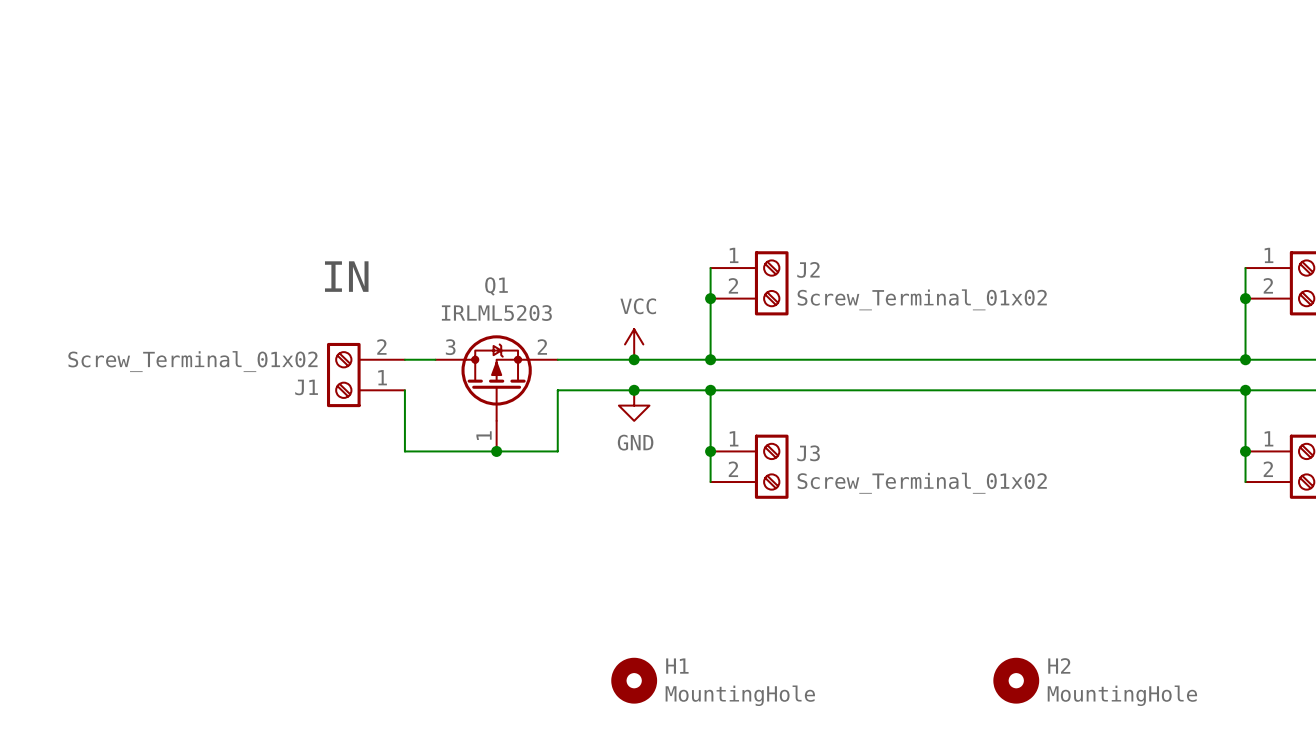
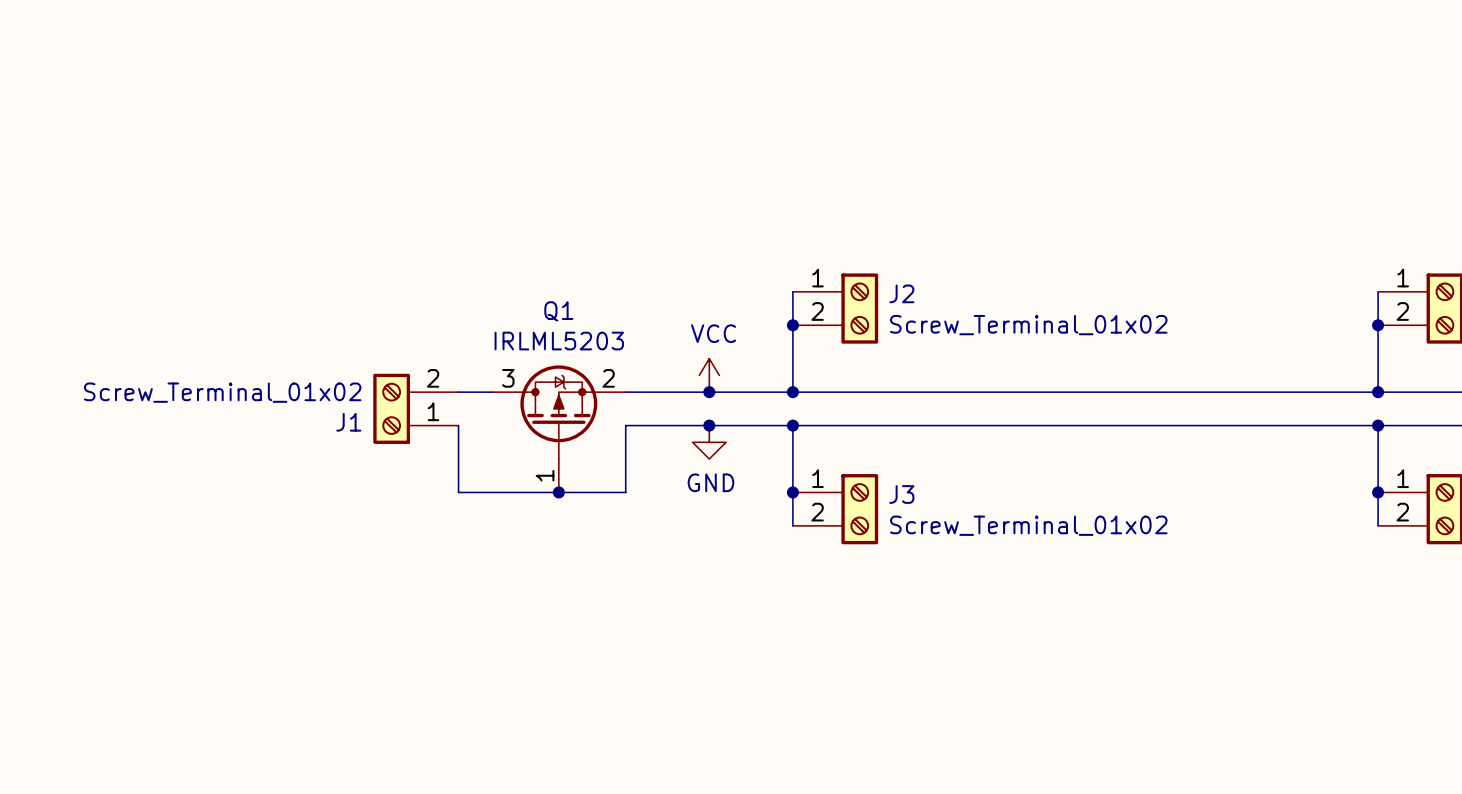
text: IN (346, 276) -> none
H1: MountingHole (634, 680) -> none
H2: MountingHole (1016, 680) -> none

